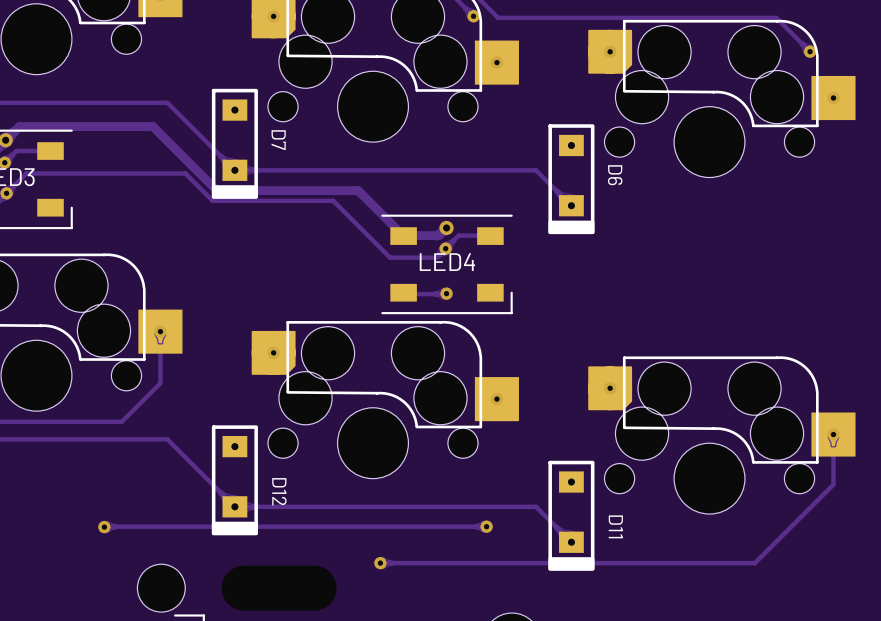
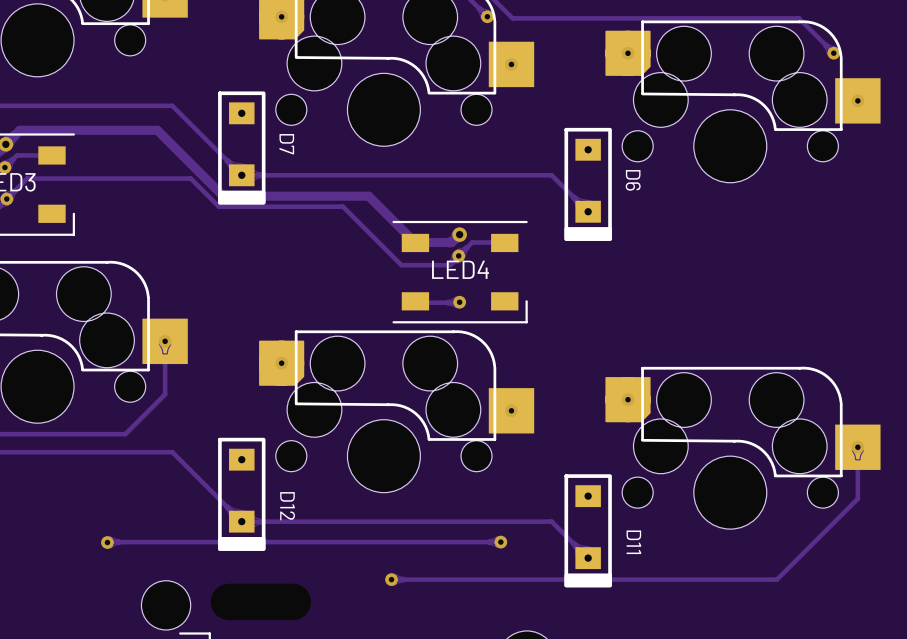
part: none -> (260, 601)
part: (279, 588) -> none

